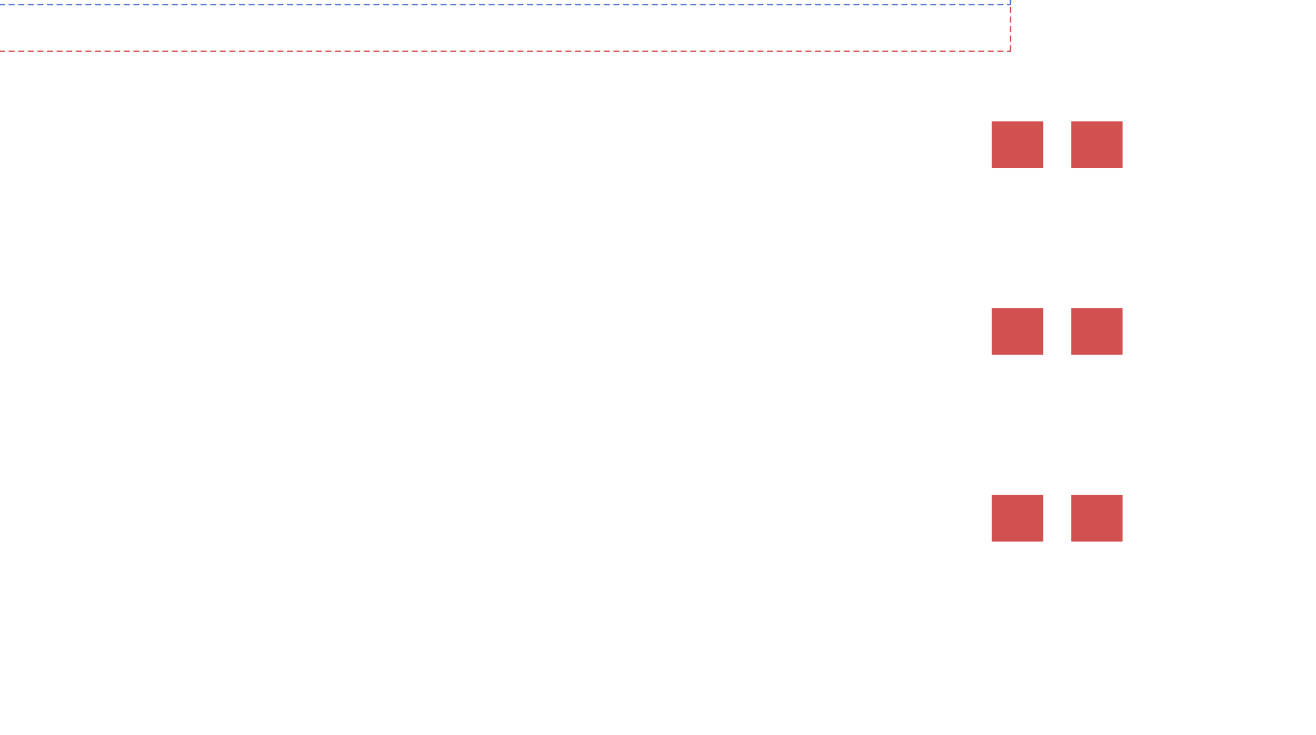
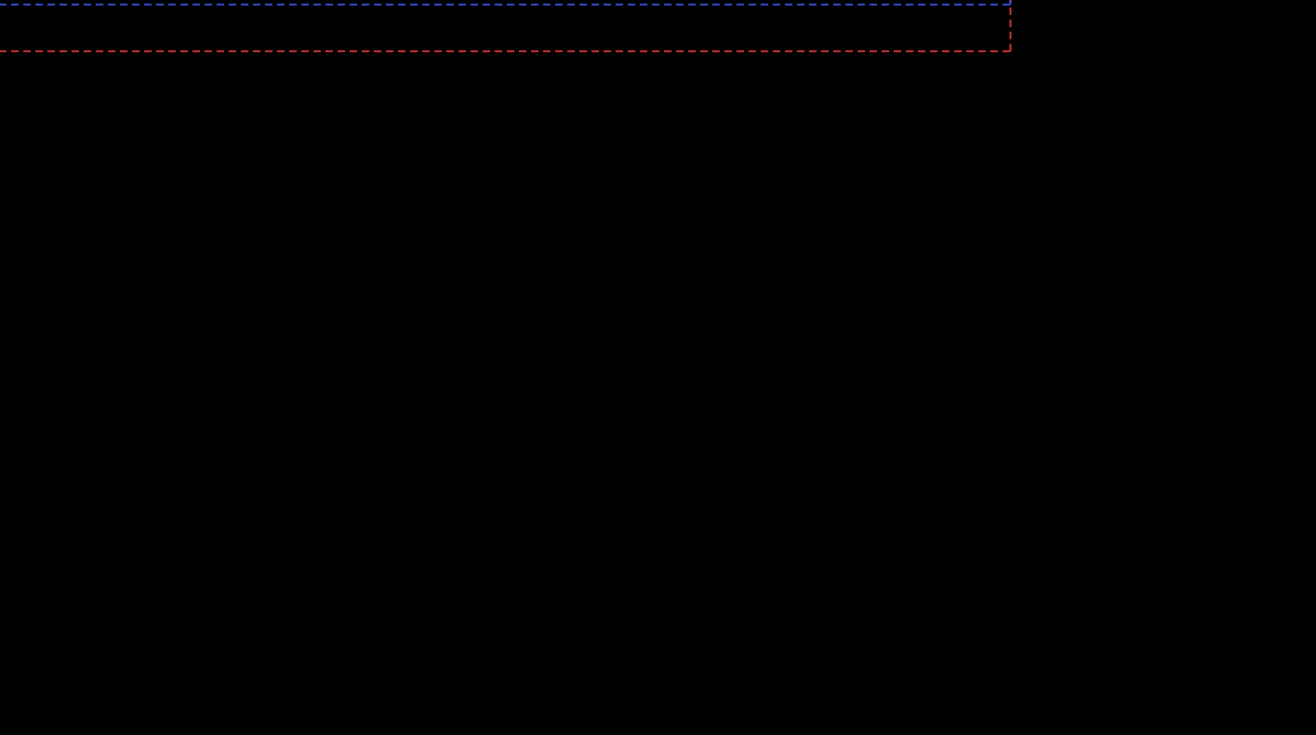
part: (1057, 144) -> none
part: (1057, 331) -> none
part: (1057, 518) -> none

